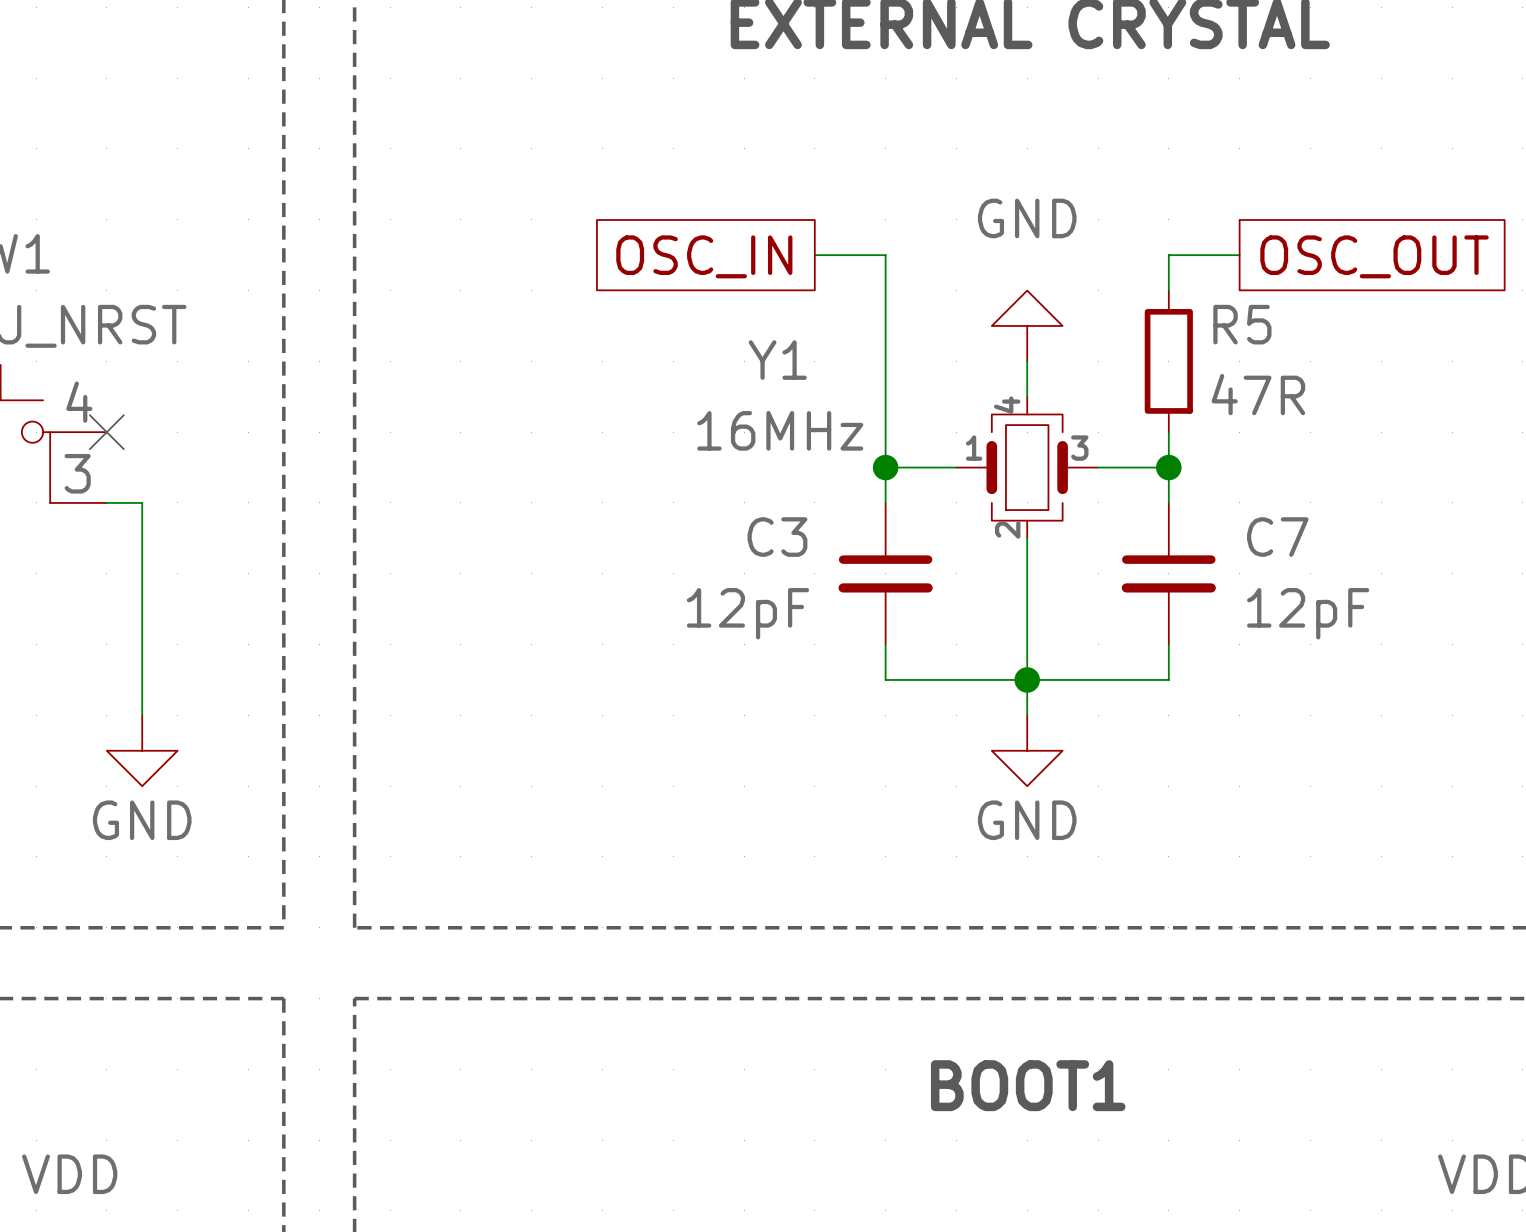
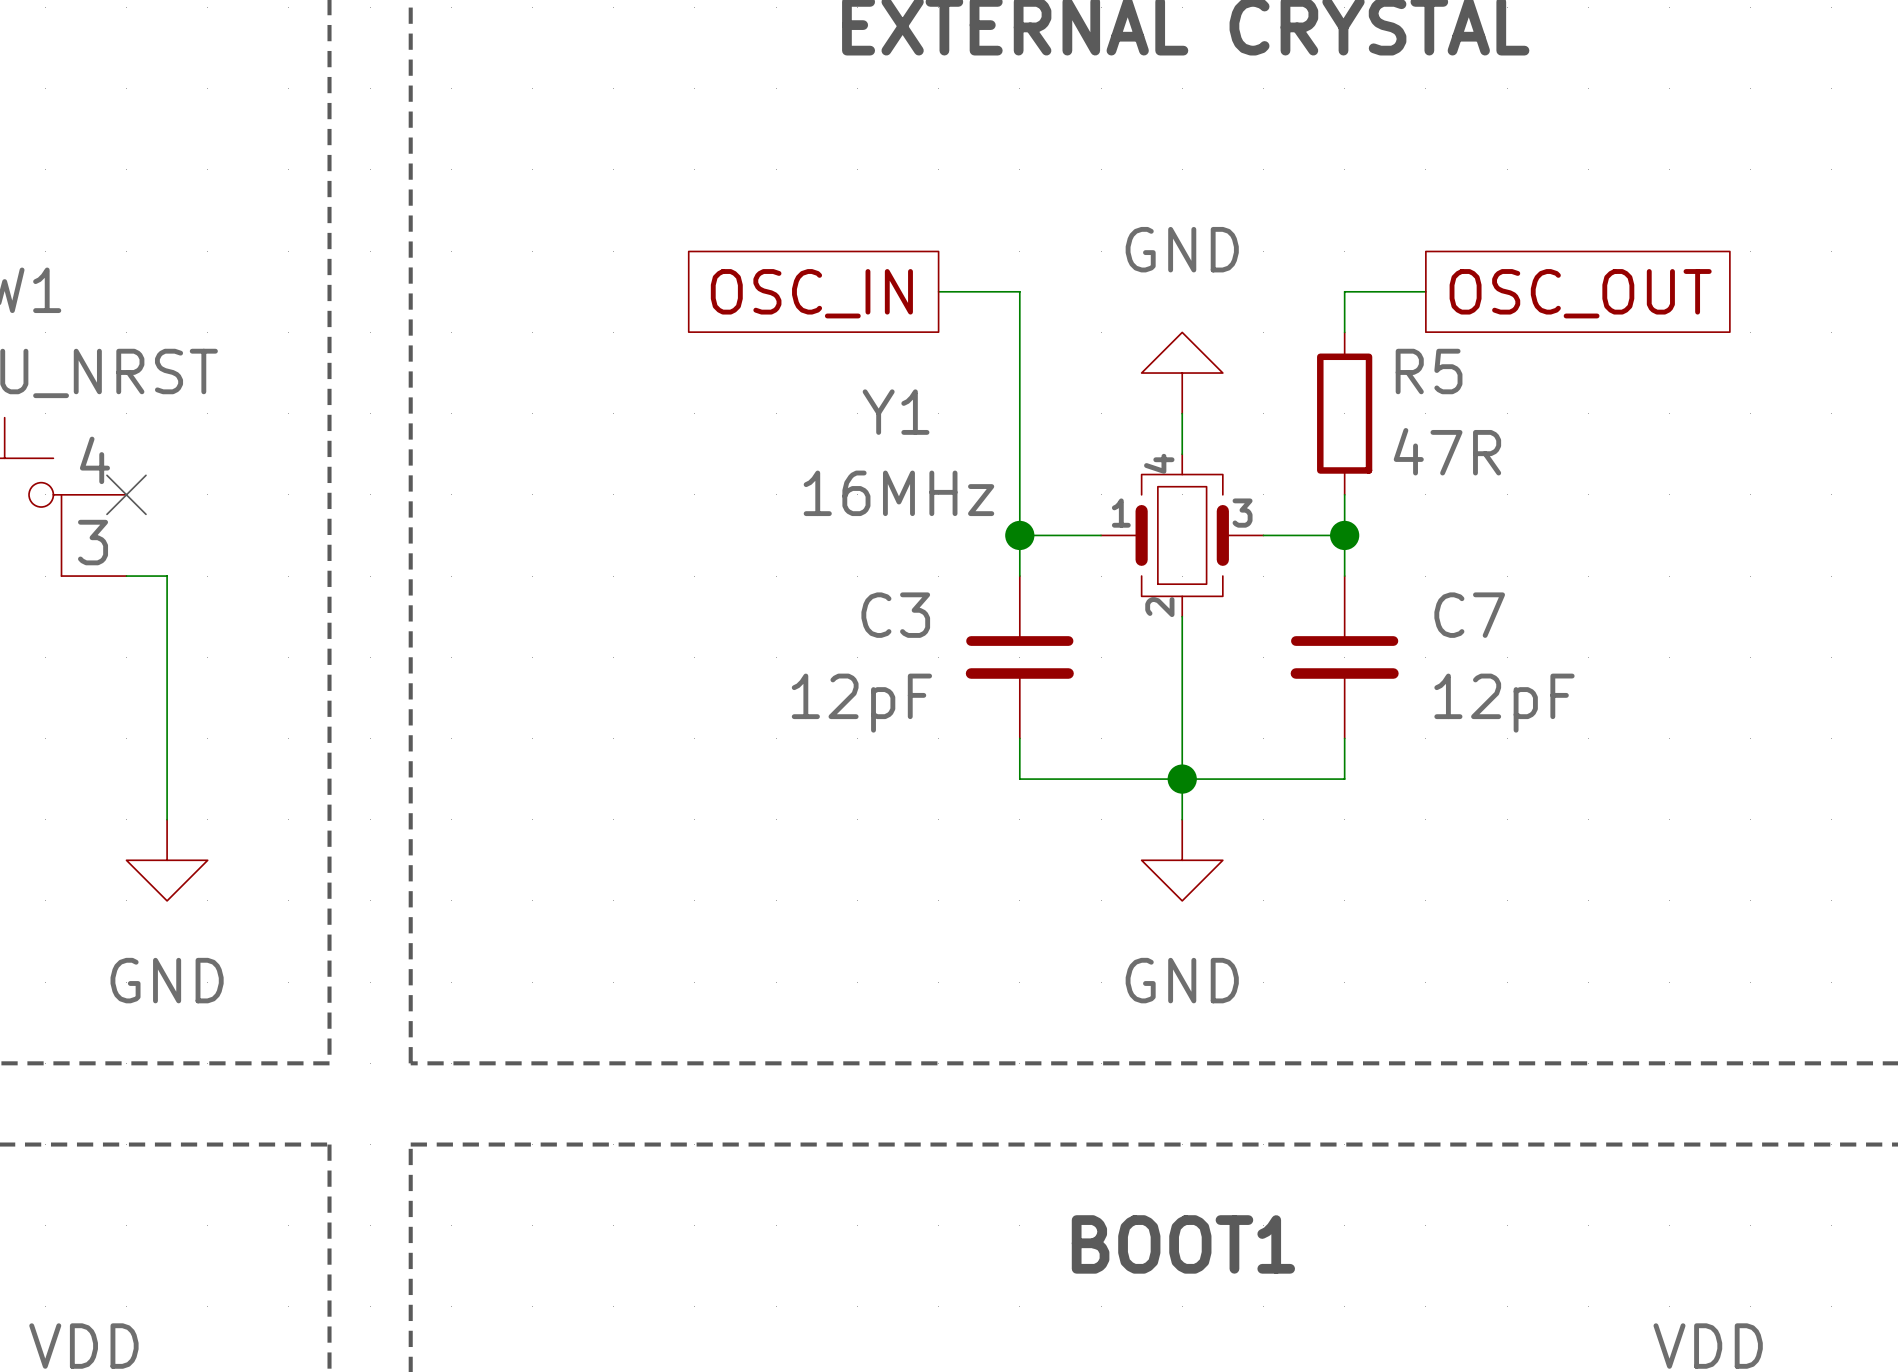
power symbol text position: GND (142, 820) -> GND (167, 980)
power symbol text position: GND (1027, 820) -> GND (1182, 980)

